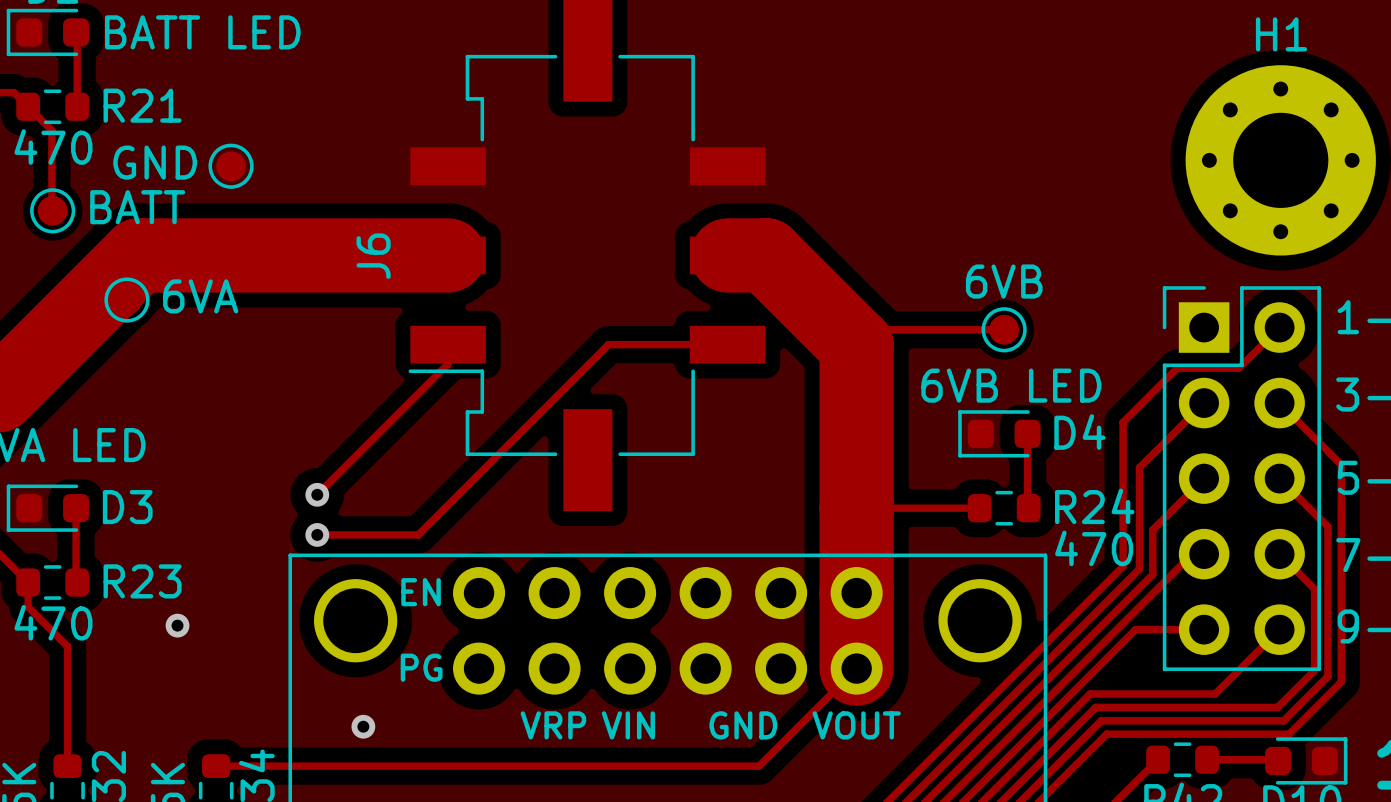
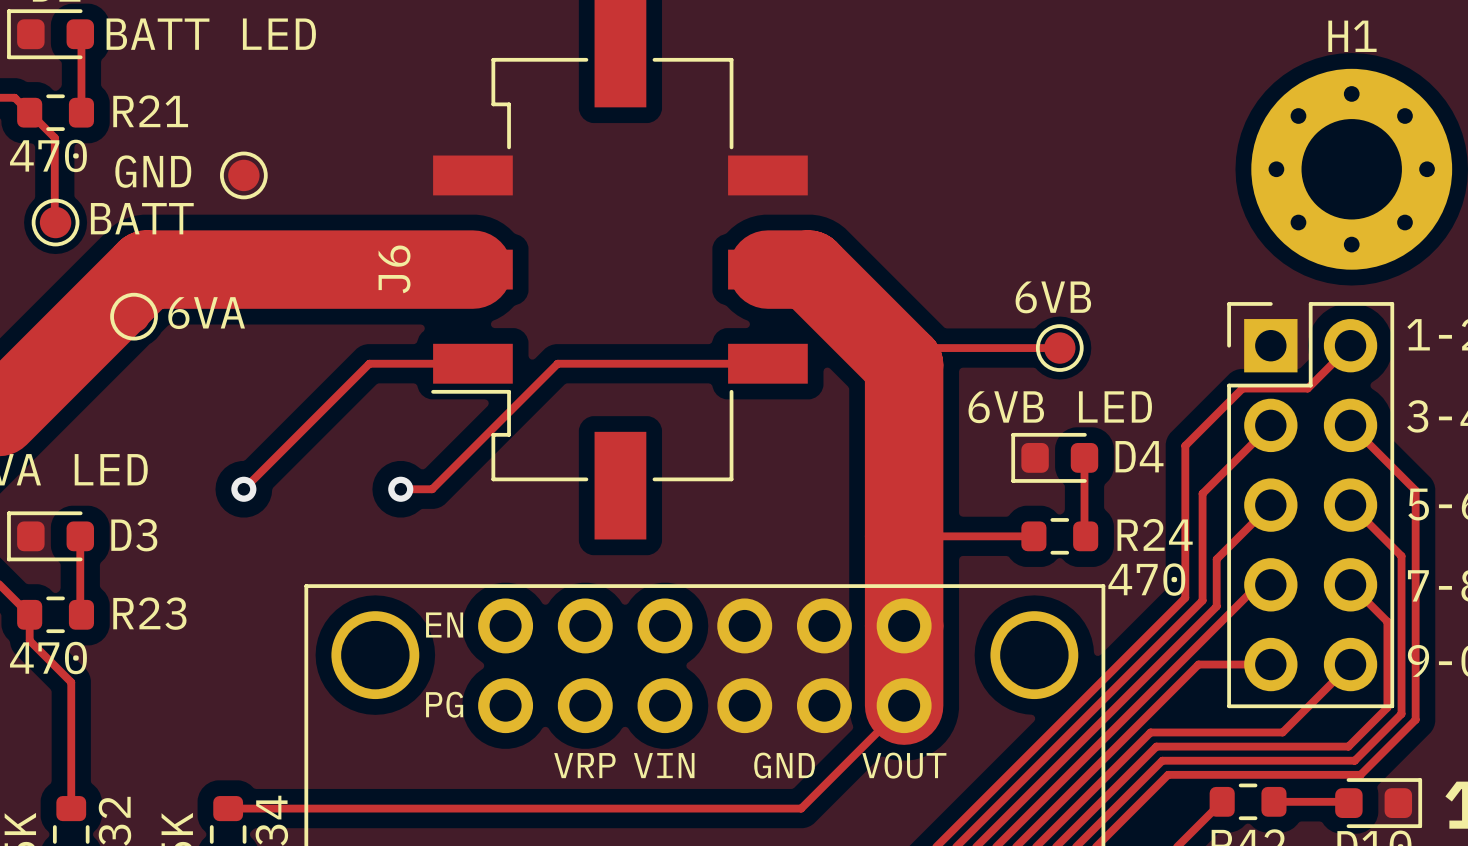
track: (448, 344) (448, 363) (317, 494) -> (472, 363) (369, 363) (243, 489)
track: (608, 344) (418, 534) (317, 534) -> (642, 363) (557, 363) (432, 489) (400, 489)
via: none -> (243, 489)
via: none -> (400, 489)
via: (317, 494) -> none
via: (317, 534) -> none
via: (177, 625) -> none
via: (363, 726) -> none

